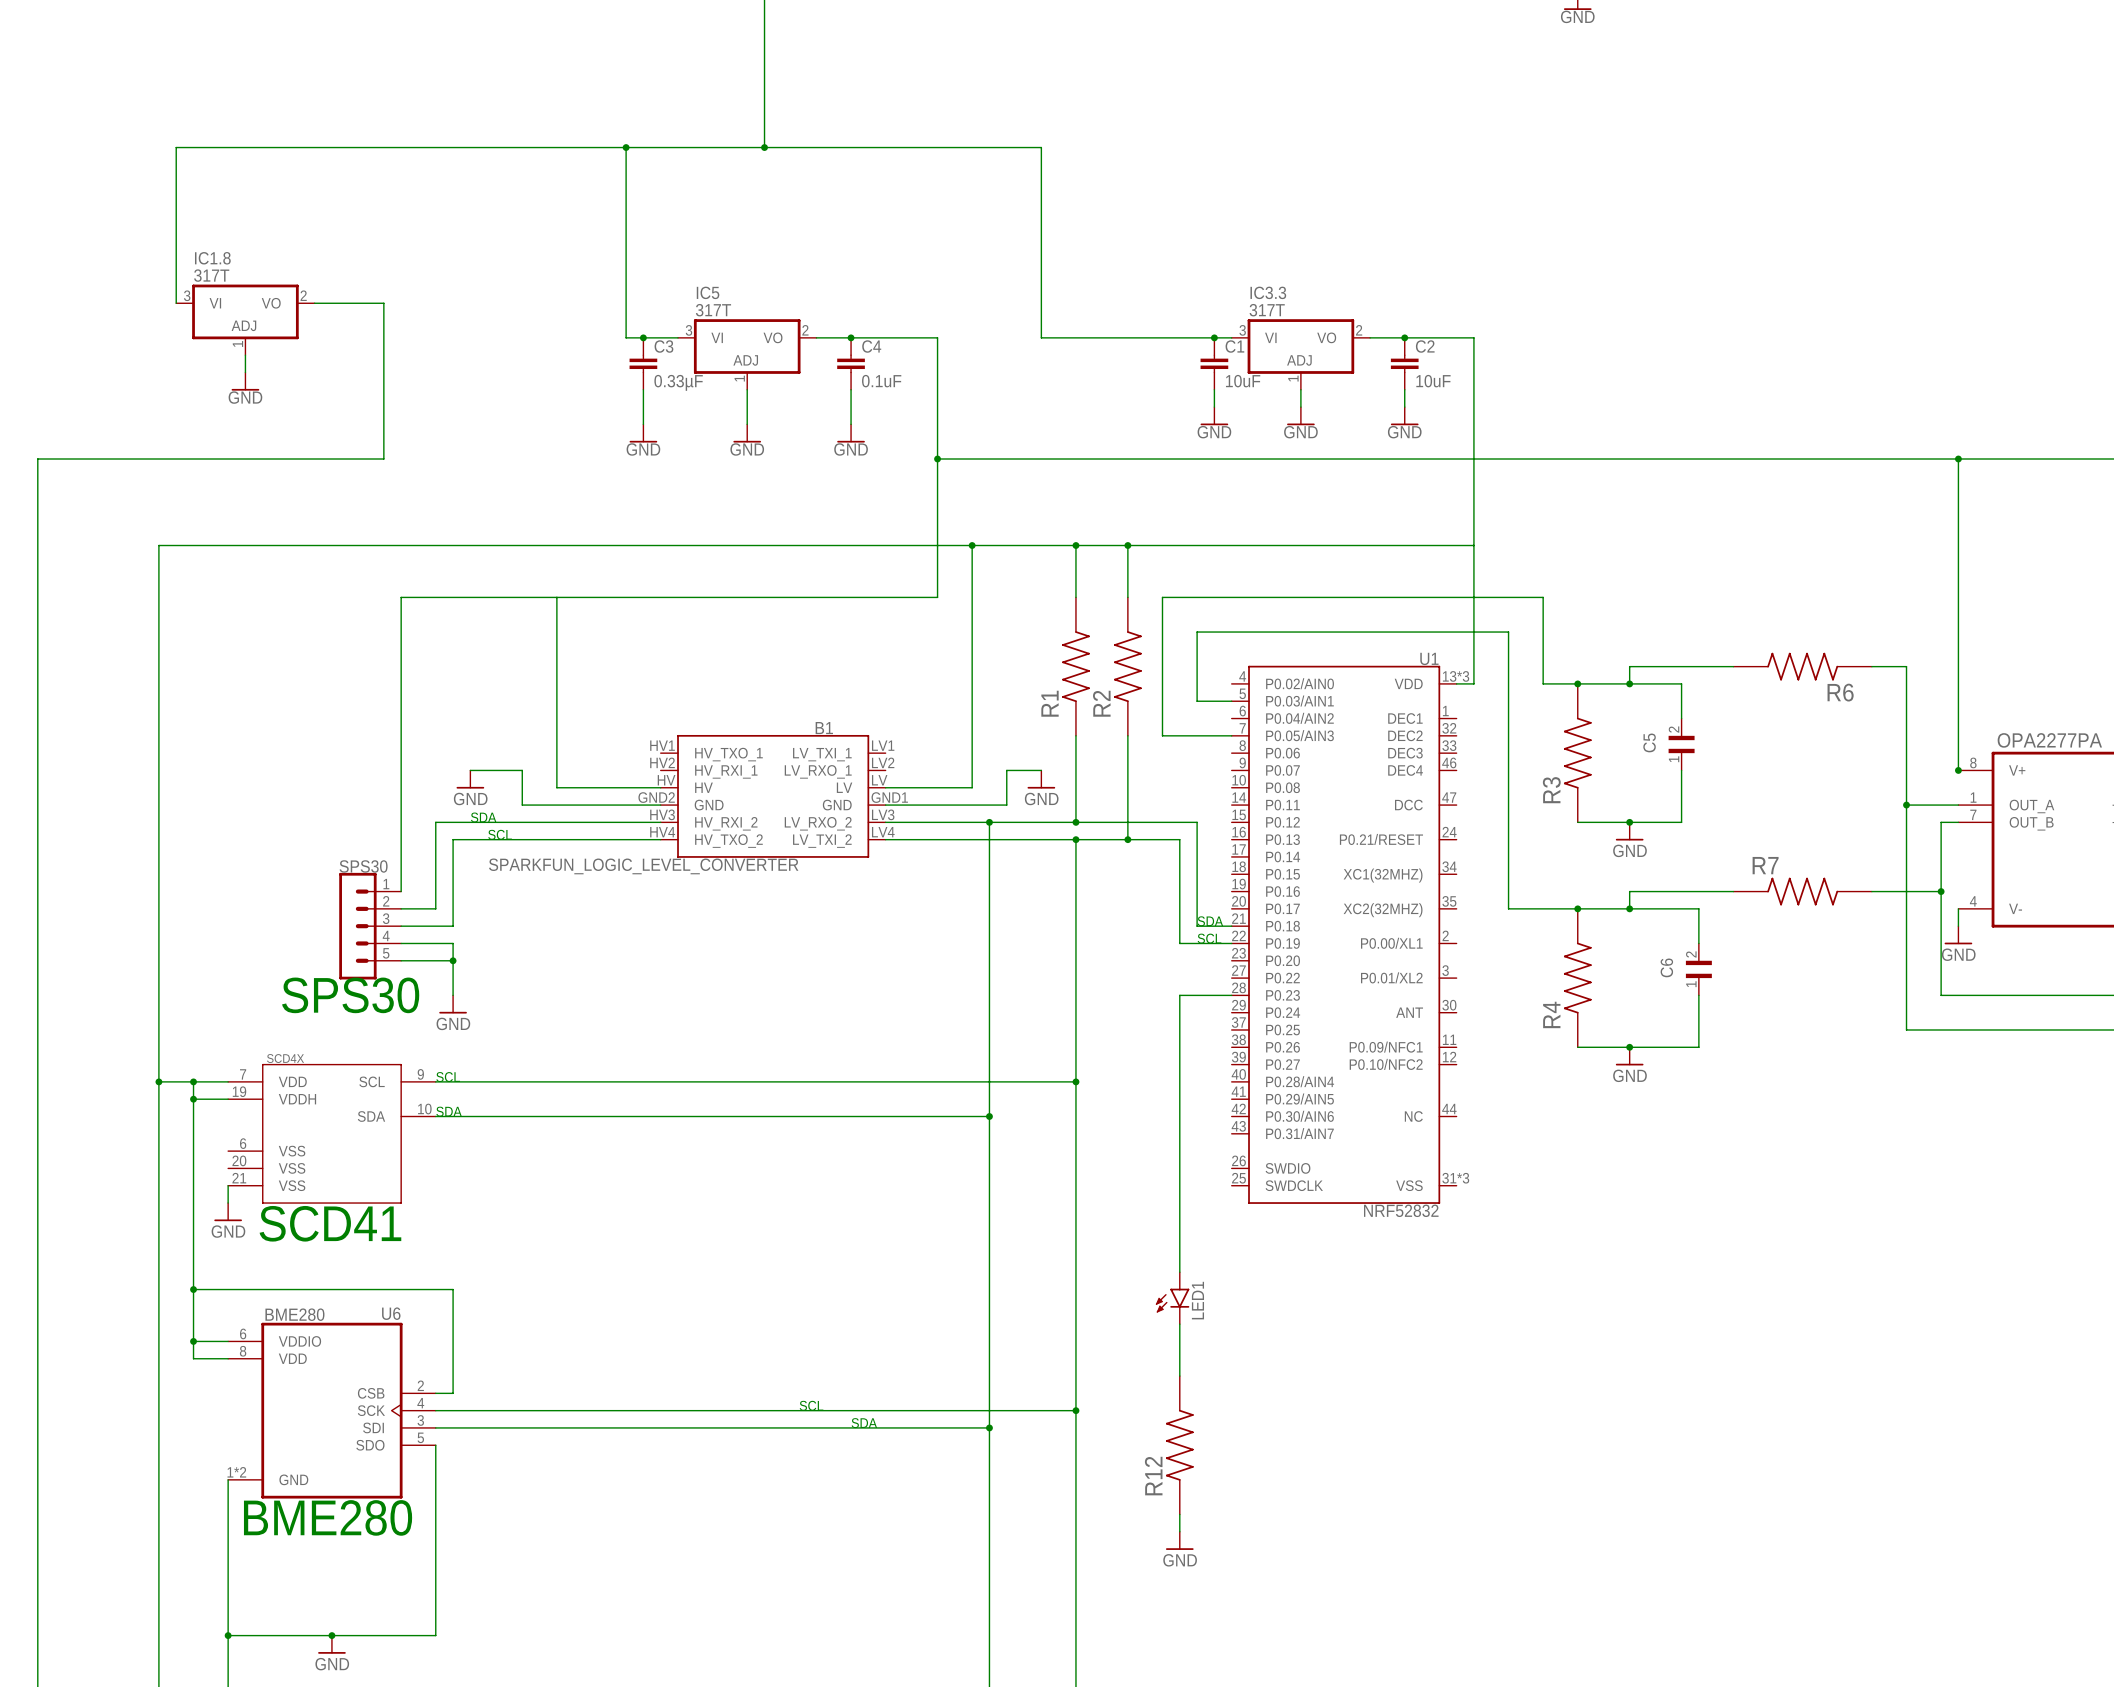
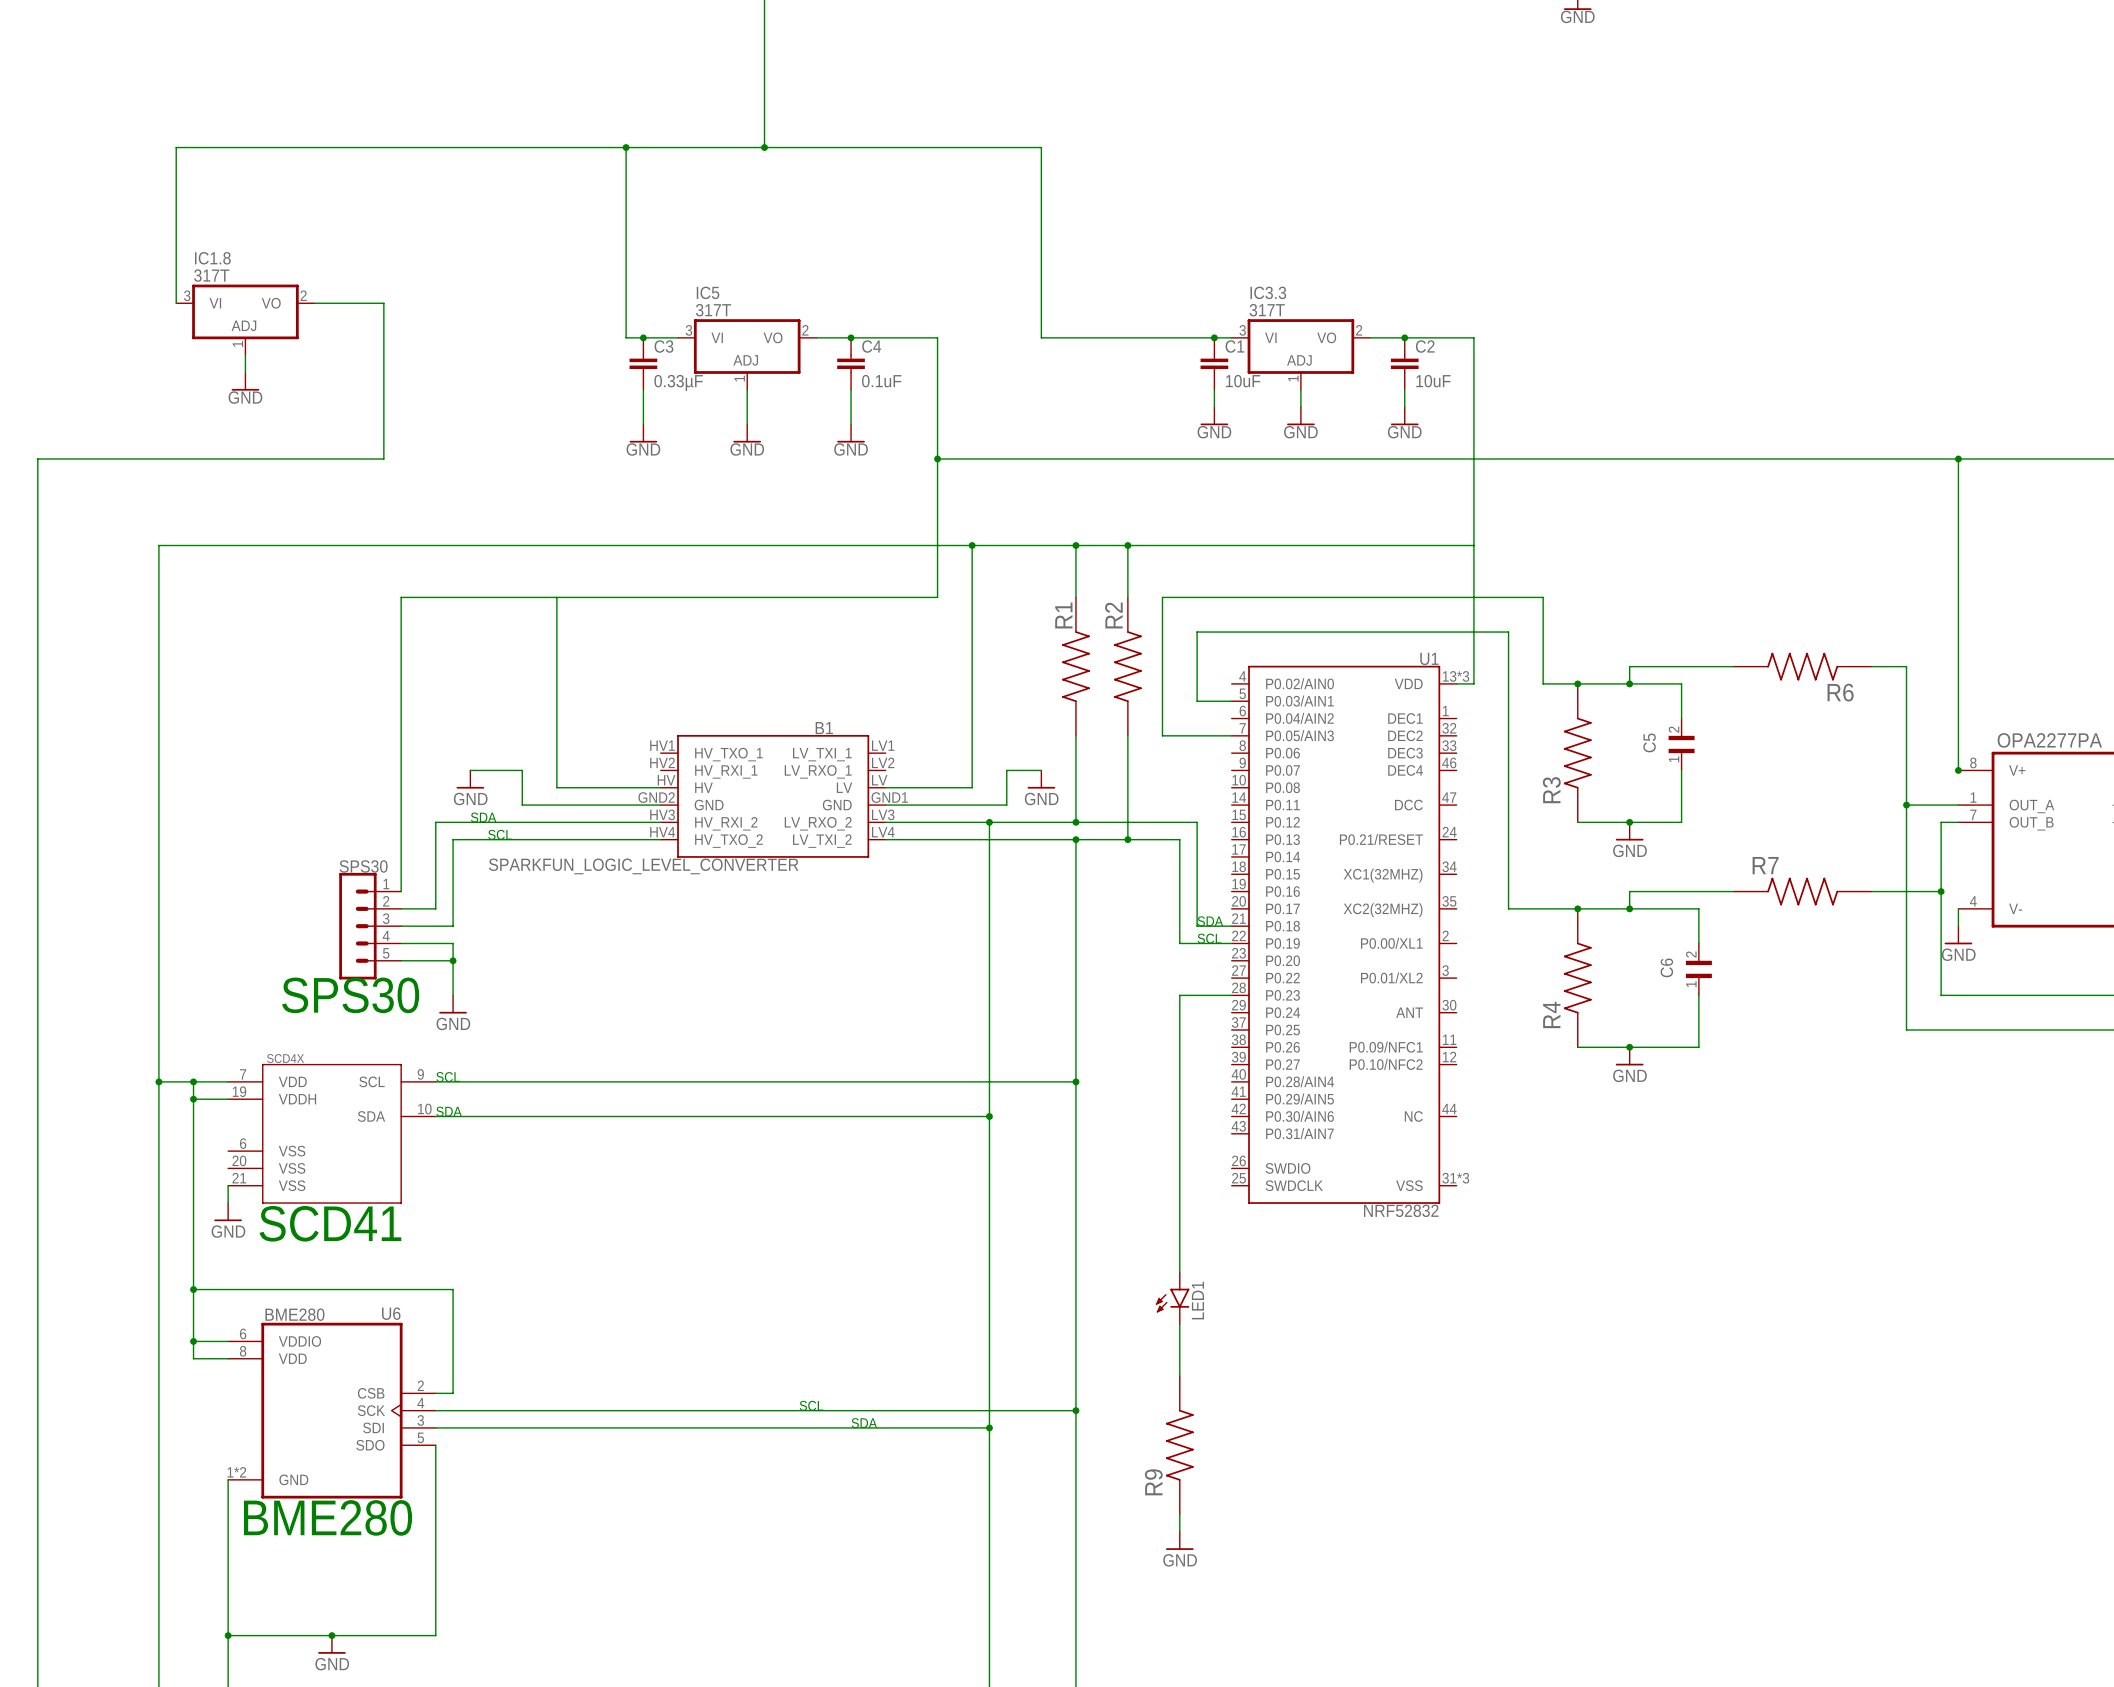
R1 name position: R1 (1050, 703) -> R1 (1063, 615)
R2 name position: R2 (1101, 703) -> R2 (1113, 615)
R12 name: R12 (1153, 1476) -> R9 (1153, 1482)

